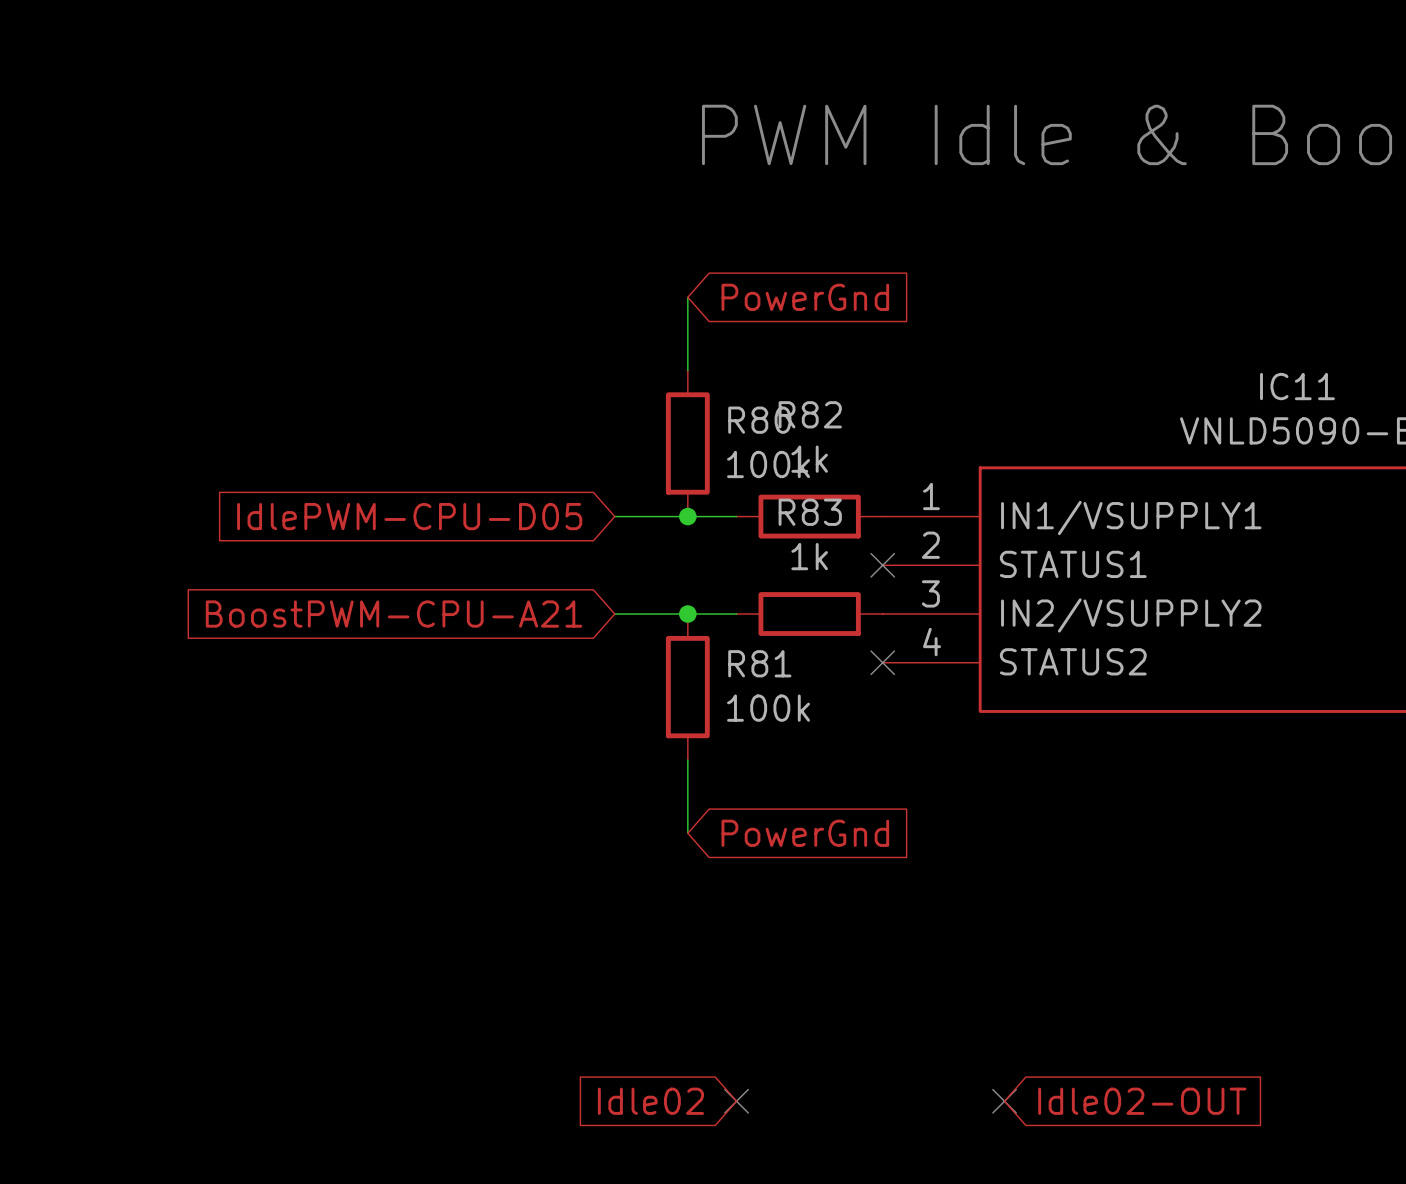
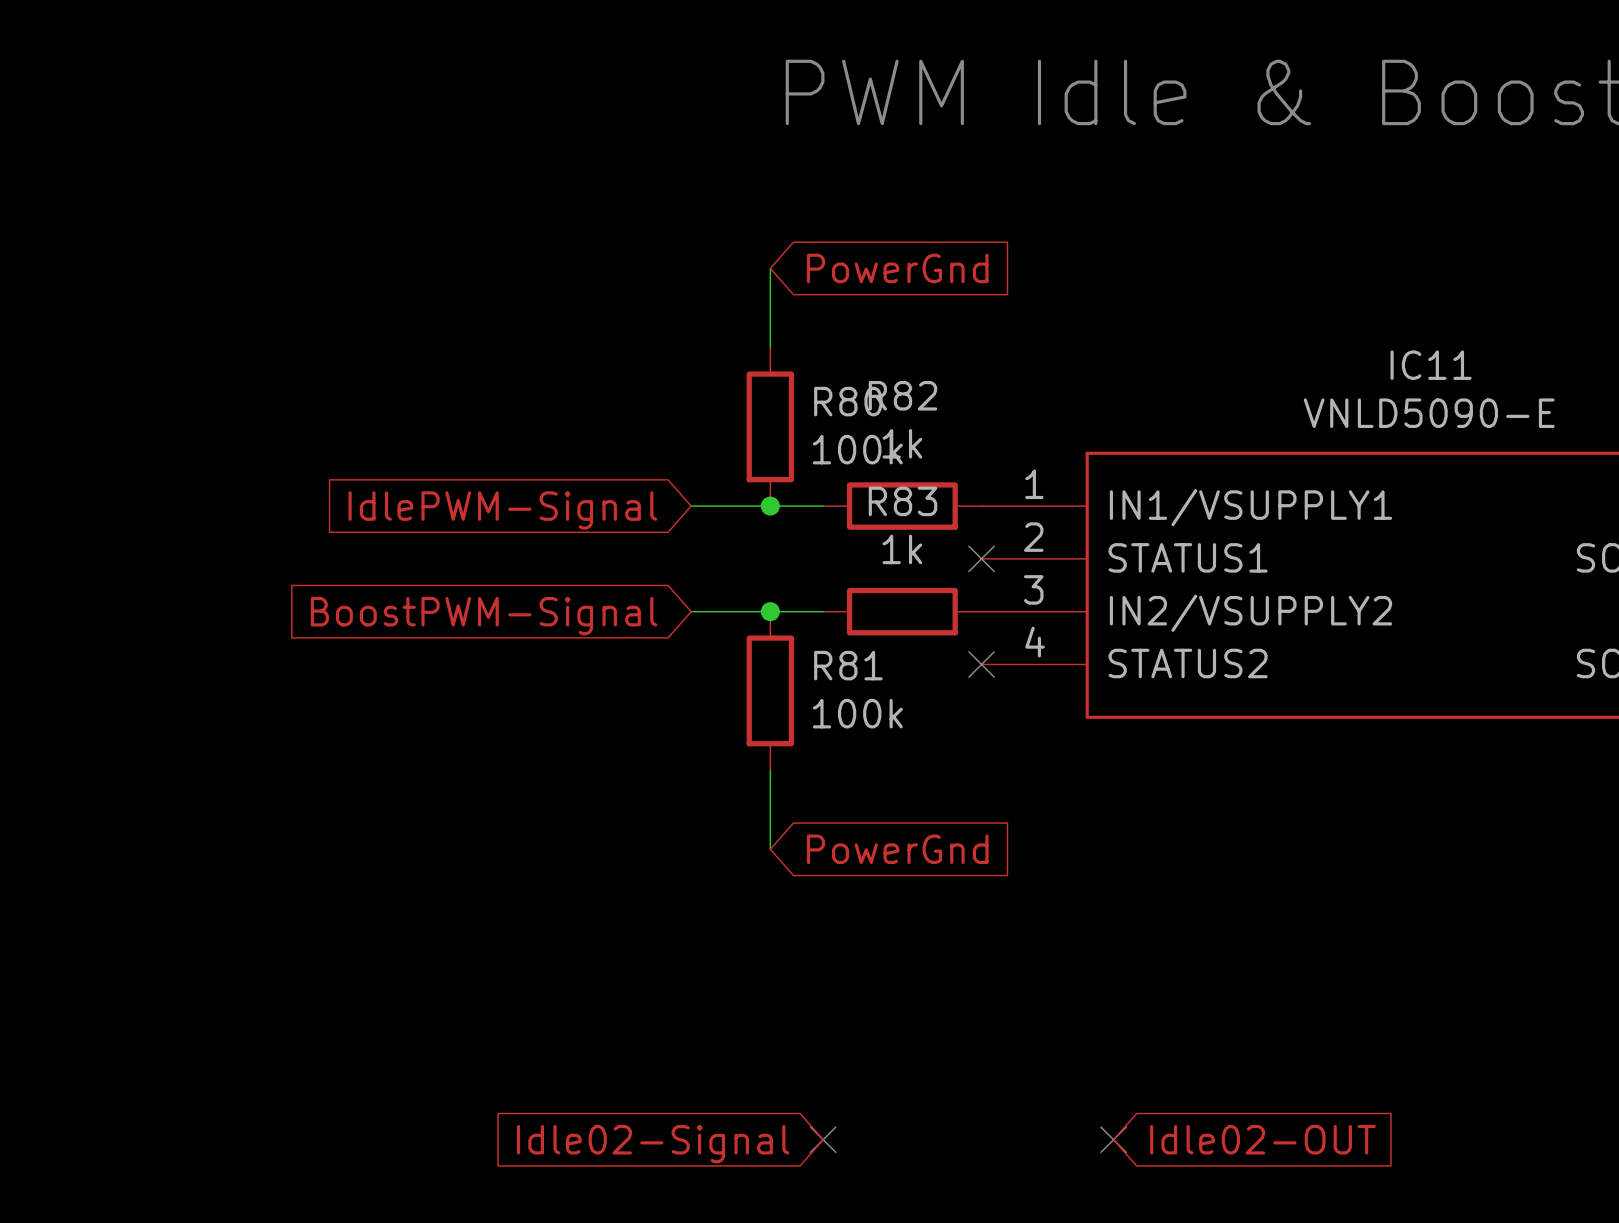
global label: IdlePWM-CPU-D05 (409, 516) -> IdlePWM-Signal (502, 510)
global label: BoostPWM-CPU-A21 (394, 614) -> BoostPWM-Signal (483, 616)
global label: Idle02 (650, 1101) -> Idle02-Signal (653, 1144)

